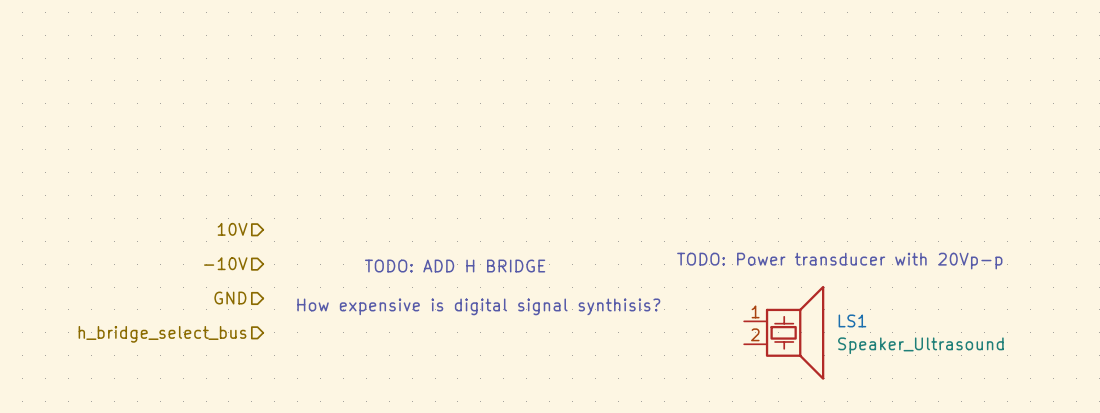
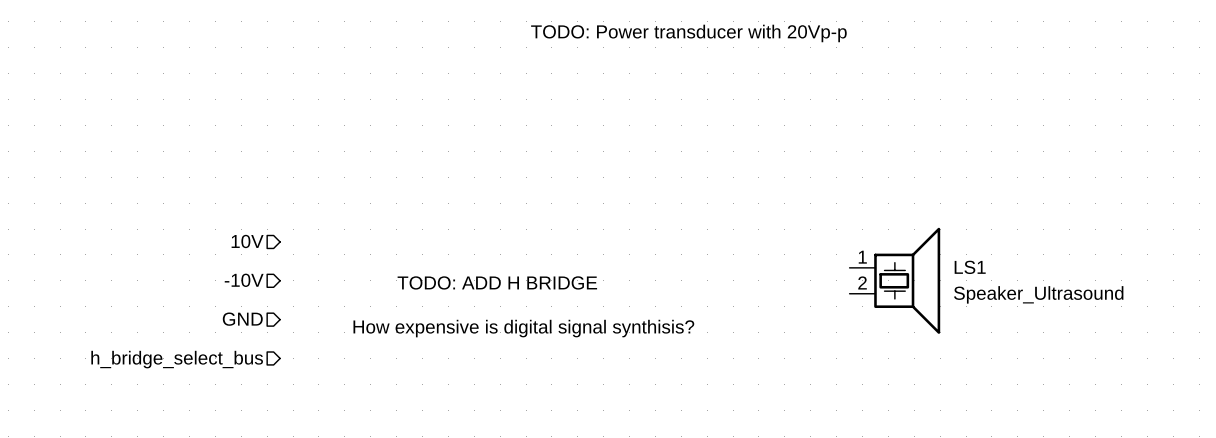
text: none -> TODO: Power transducer with 20Vp-p (688, 33)
text: TODO: Power transducer with 20Vp-p (839, 261) -> none
LS1 position: (784, 332) -> (894, 280)

